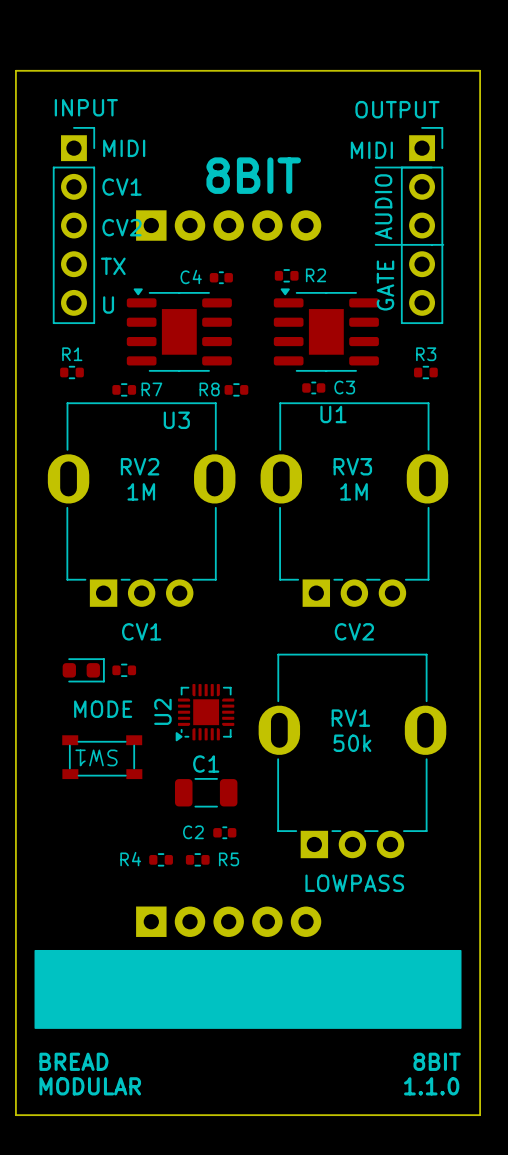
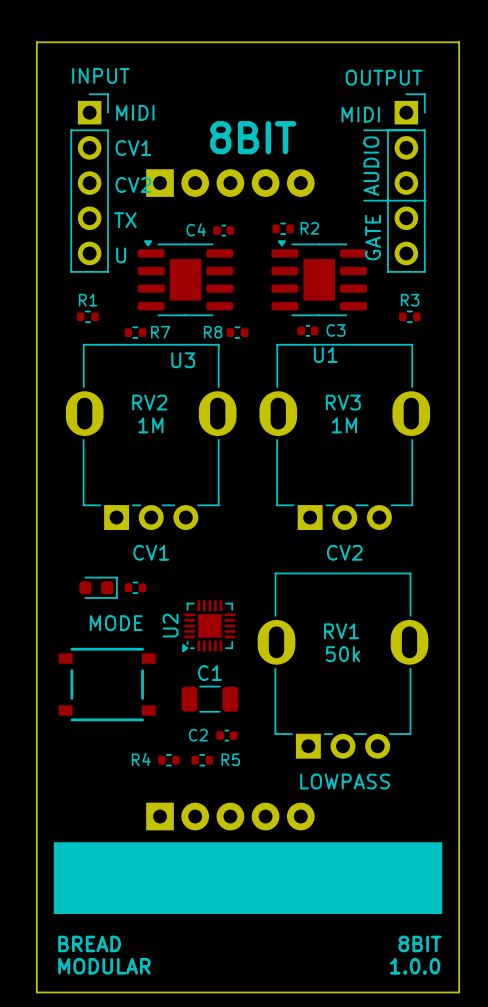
SW1: (102, 757) -> none
part: none -> (107, 684)
text: 1.1.0 (431, 1086) -> 1.0.0 (415, 966)

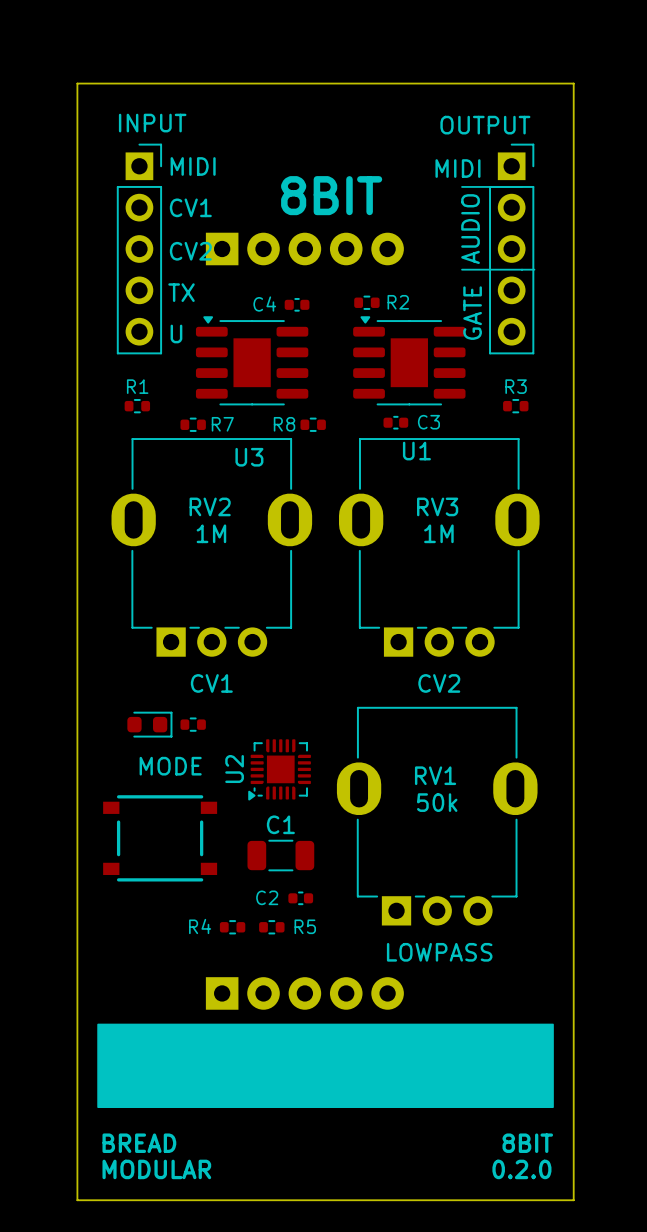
text: 1.0.0 (415, 966) -> 0.2.0 (521, 1169)

